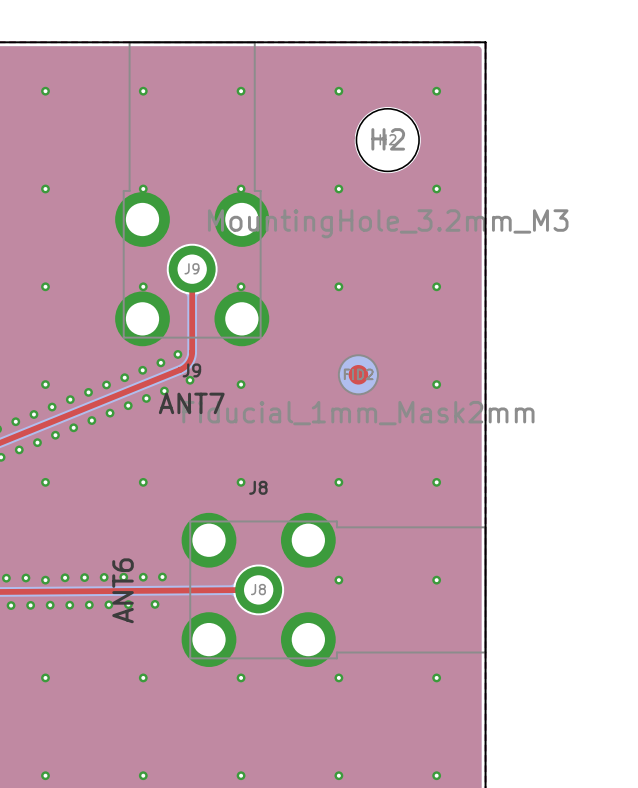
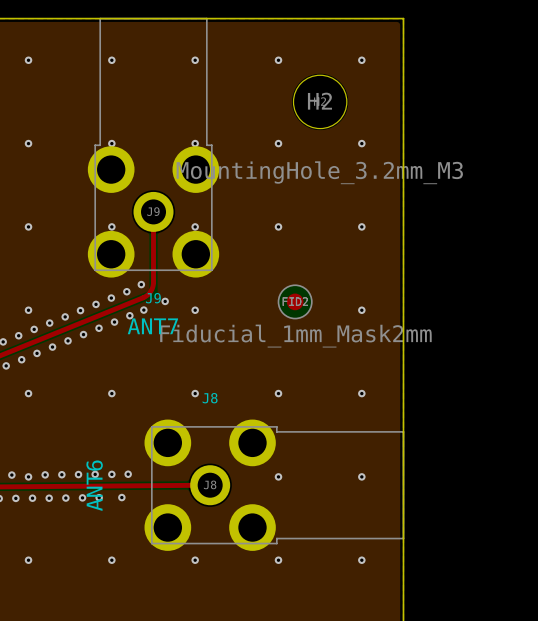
via: none -> (165, 301)
via: (190, 380) -> none
via: none -> (143, 310)

